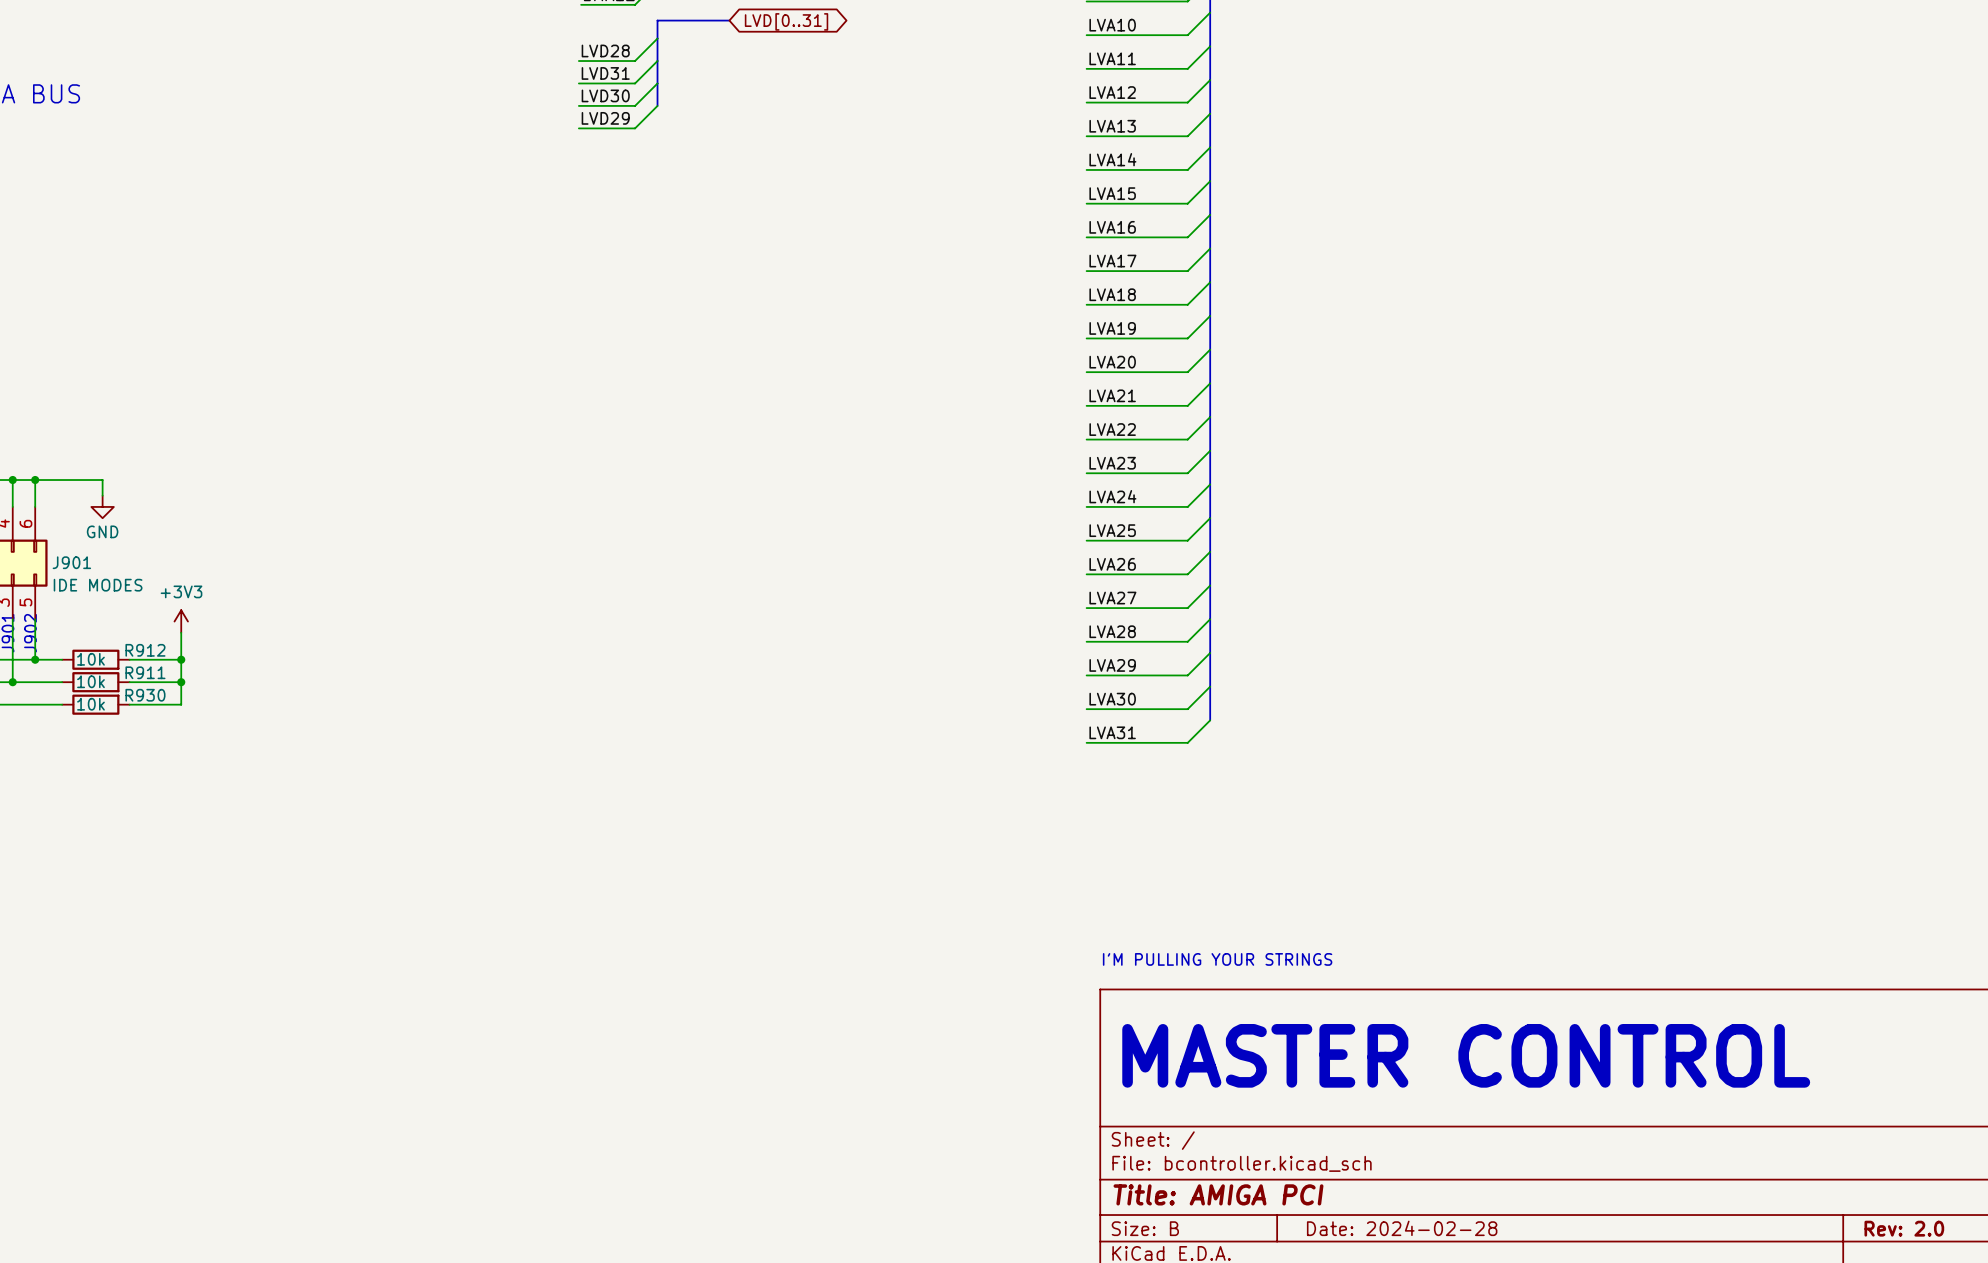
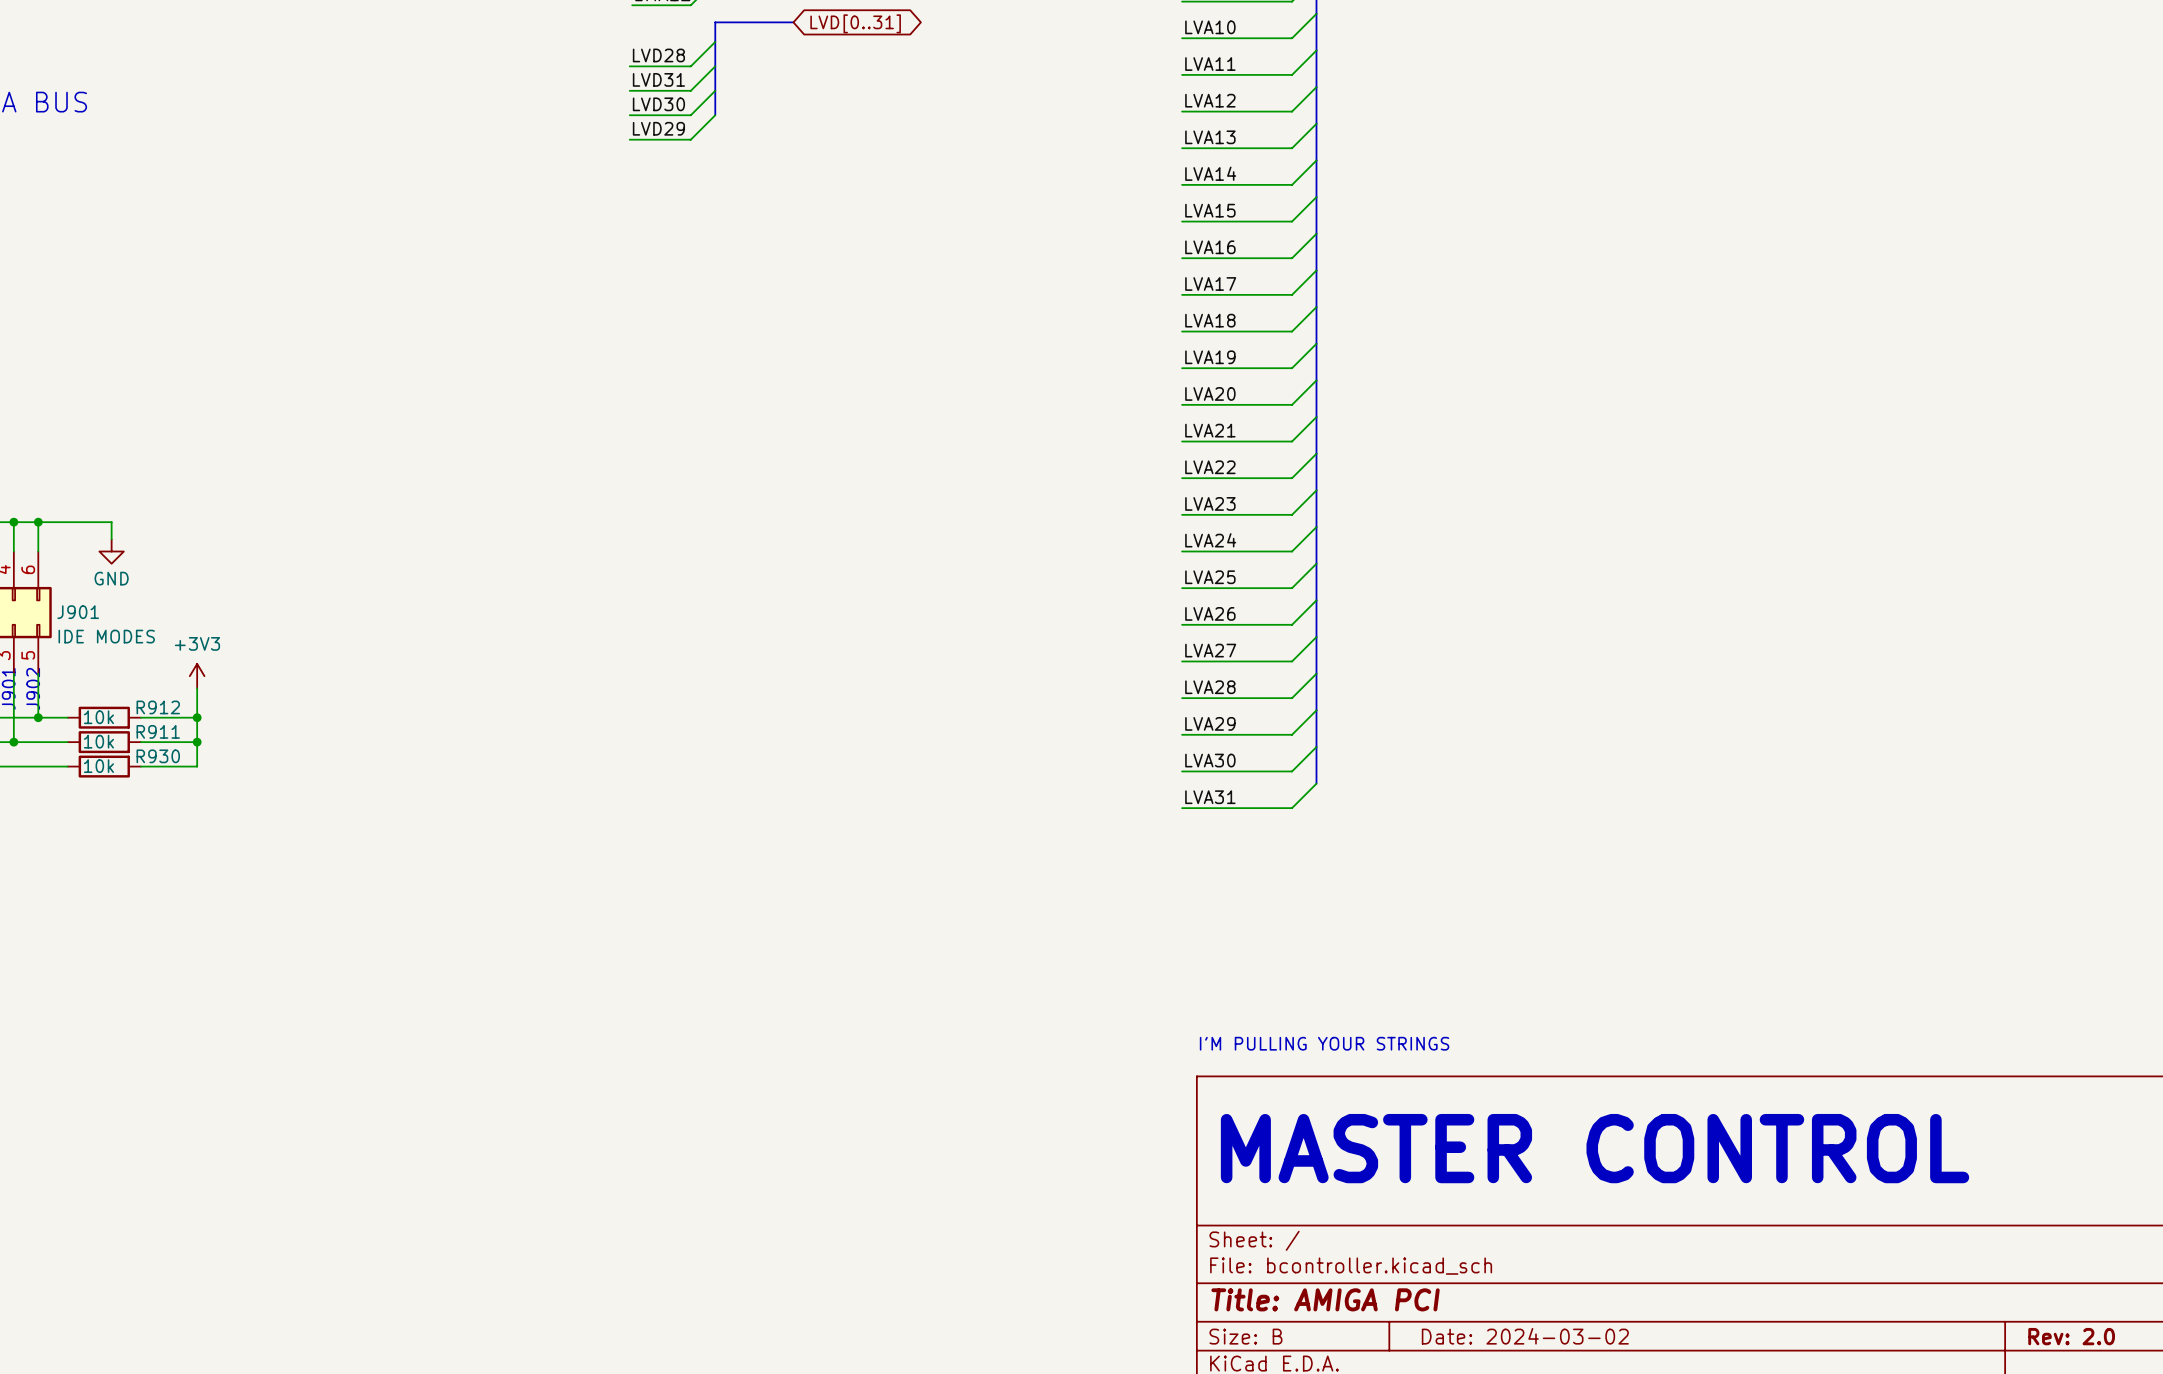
title block: Date: 2024-02-28 (1402, 1228) -> Date: 2024-03-02 (1525, 1336)

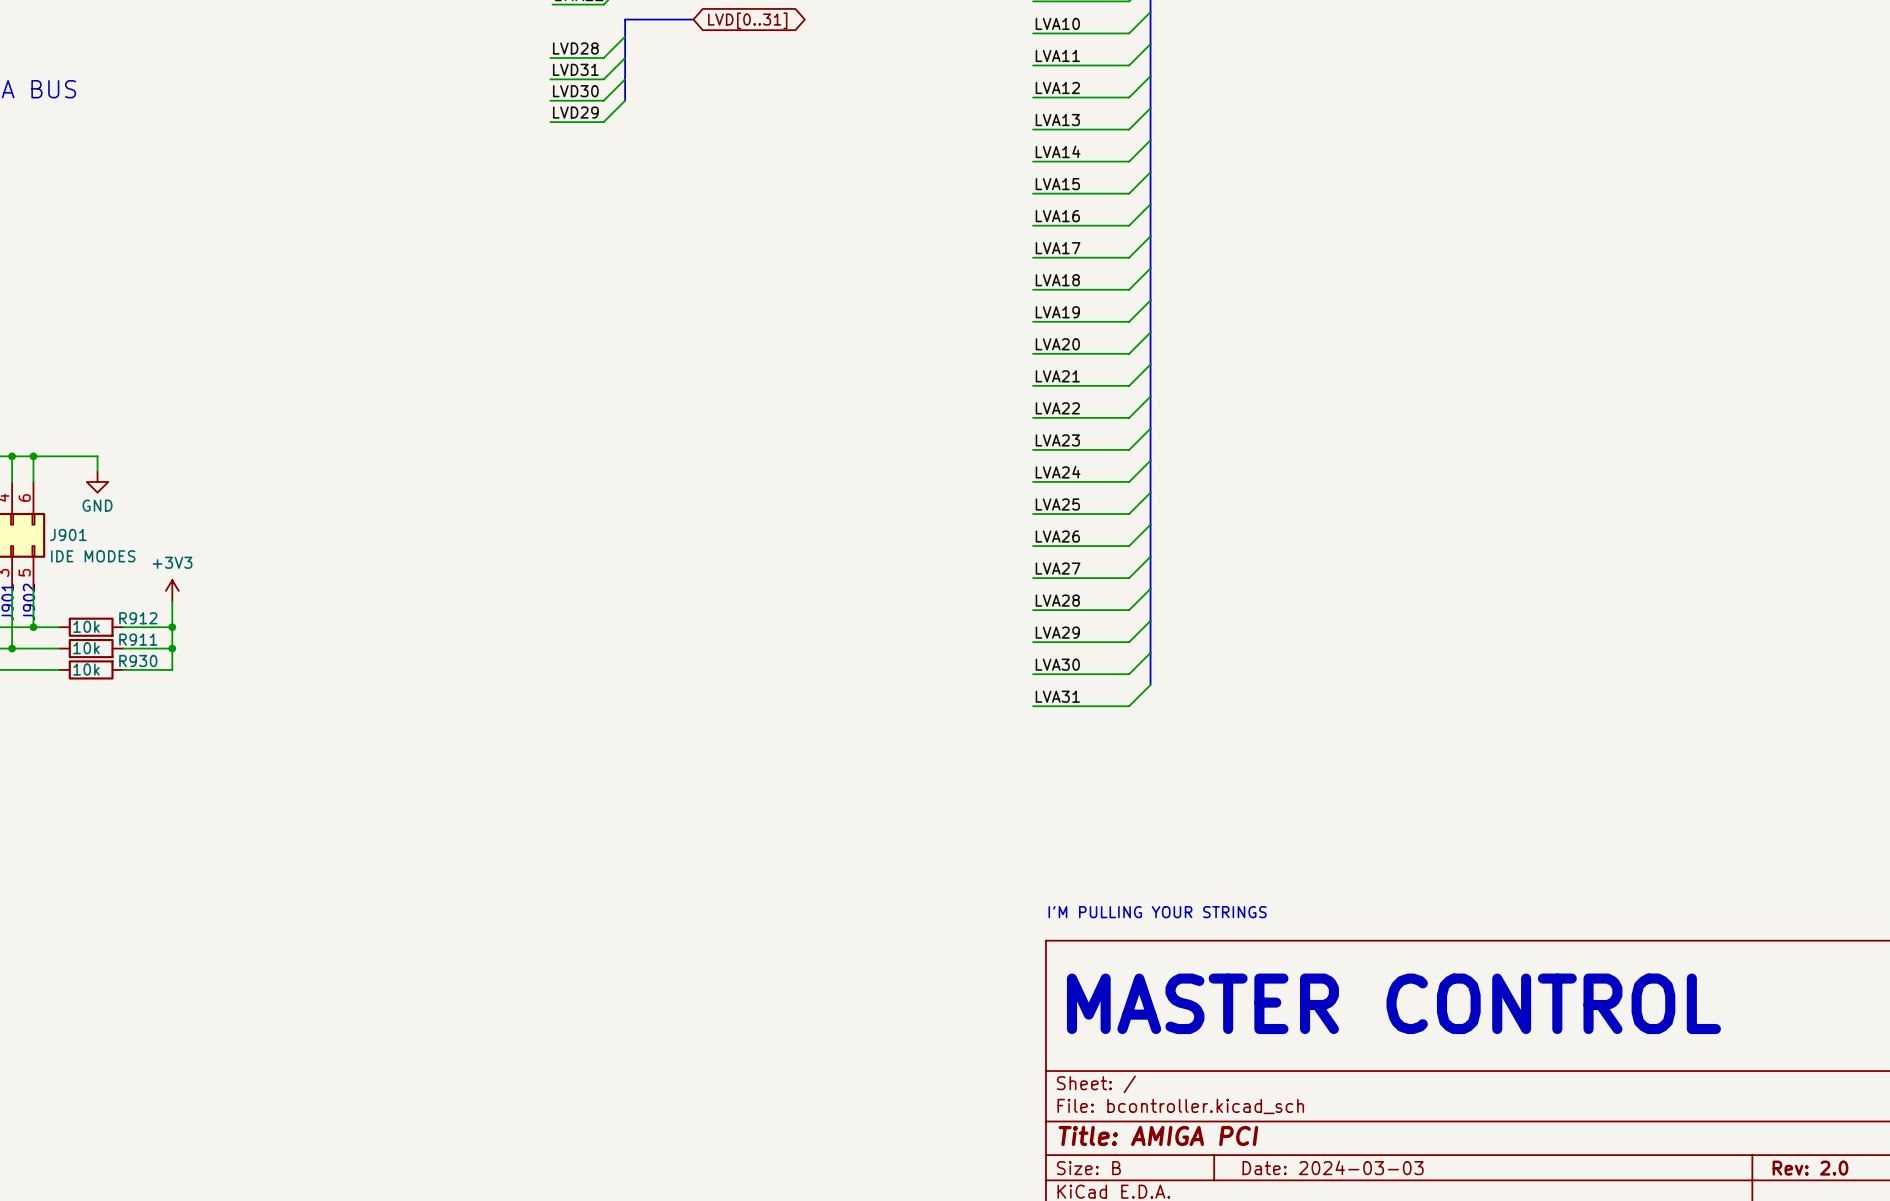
title block: Date: 2024-03-02 (1525, 1336) -> Date: 2024-03-03 (1333, 1167)

